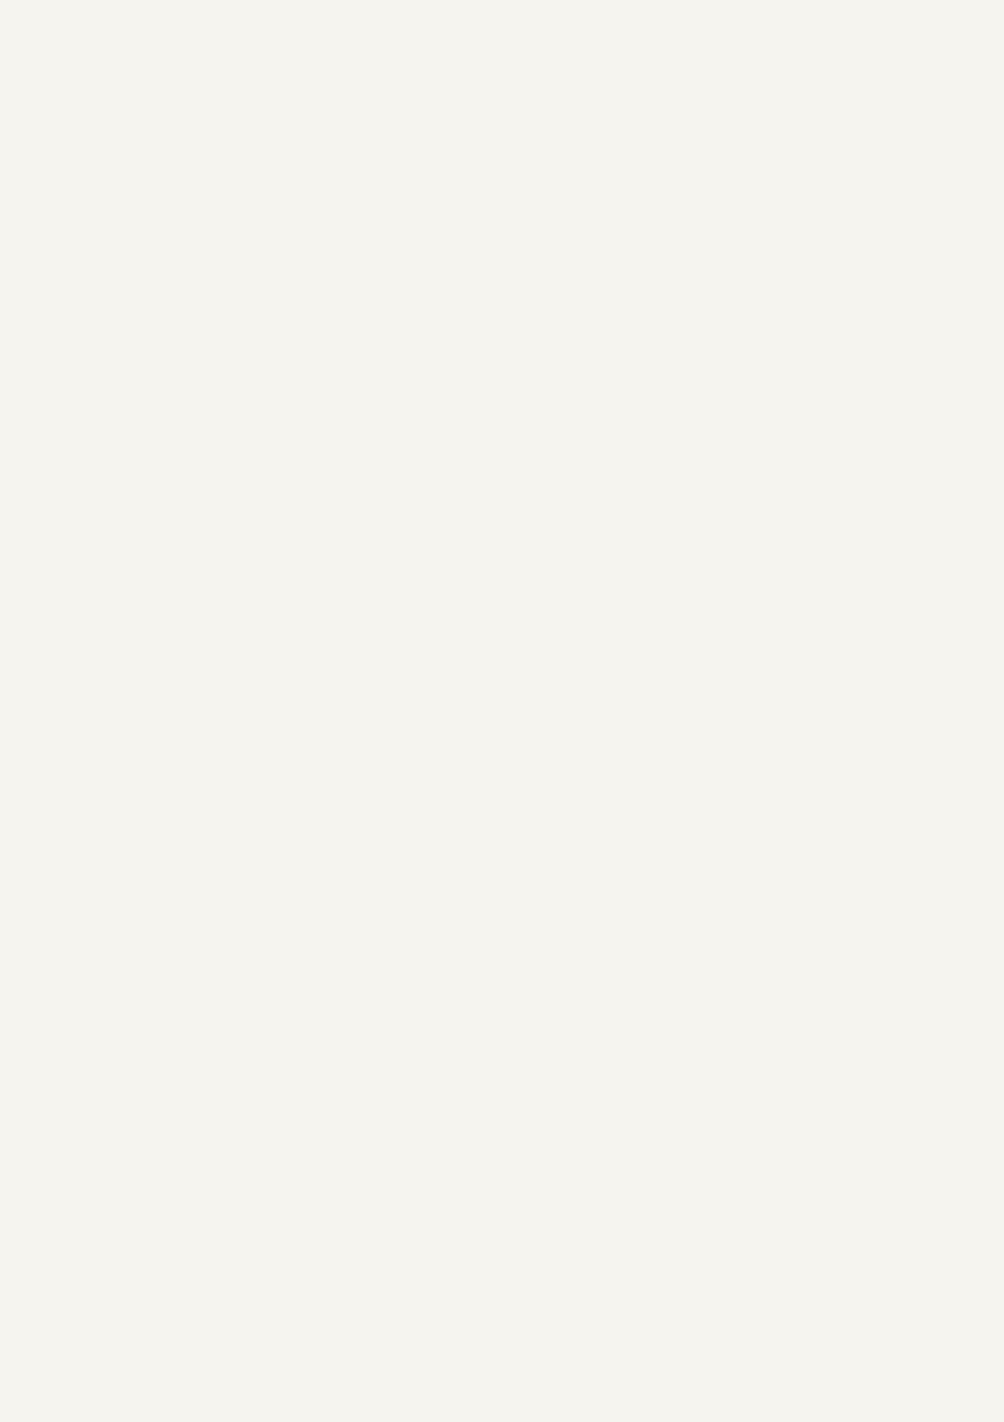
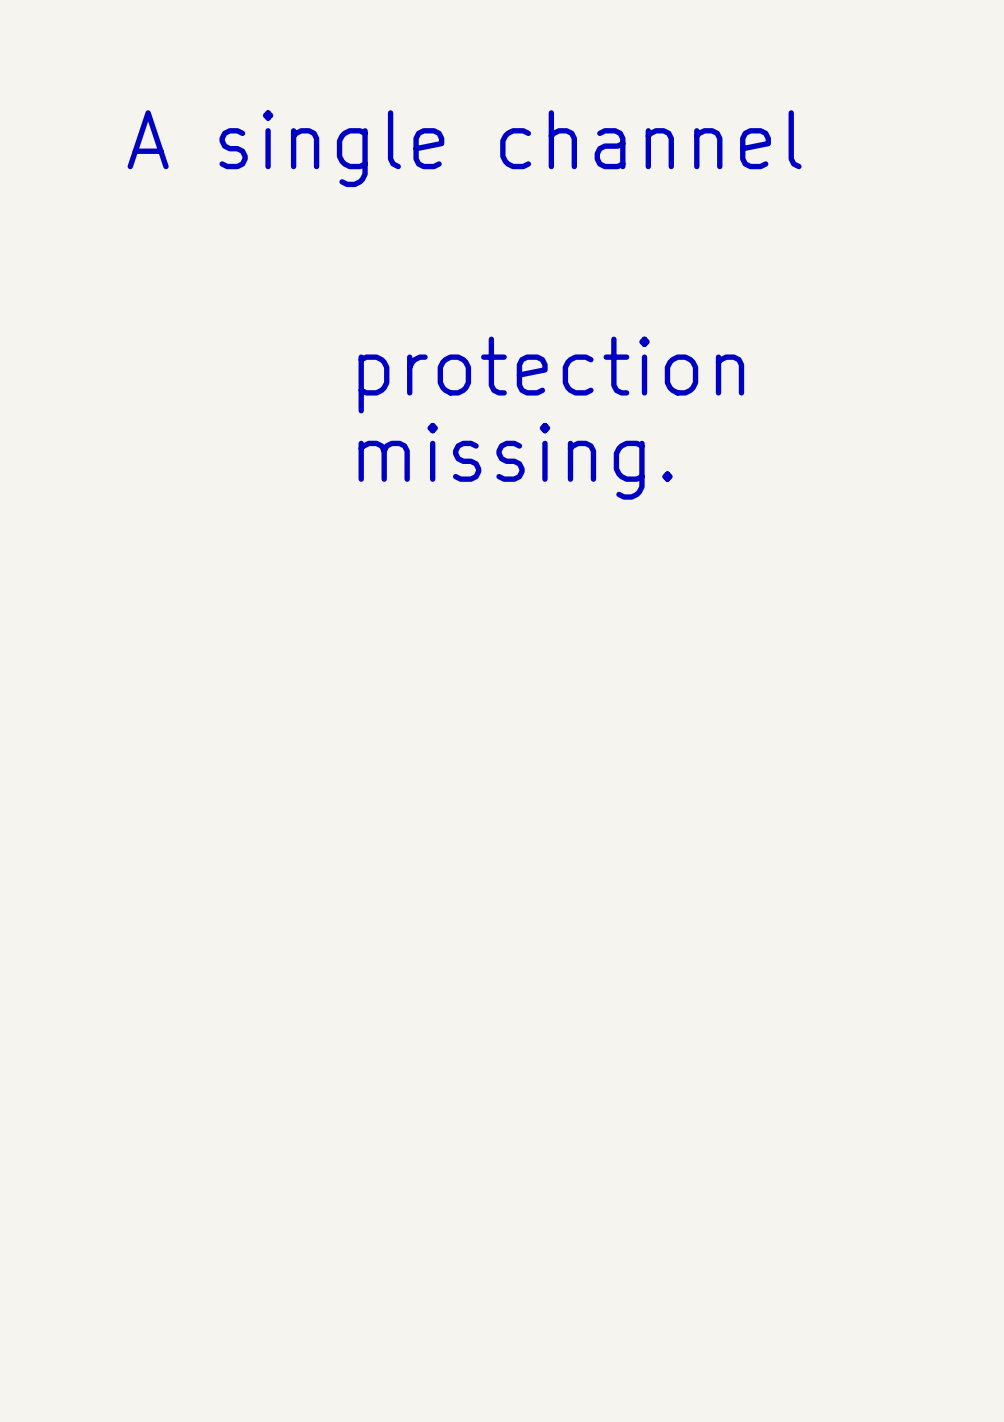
text: none -> A single channel (464, 148)
text: none -> protection (551, 375)
text: none -> missing. (515, 461)

